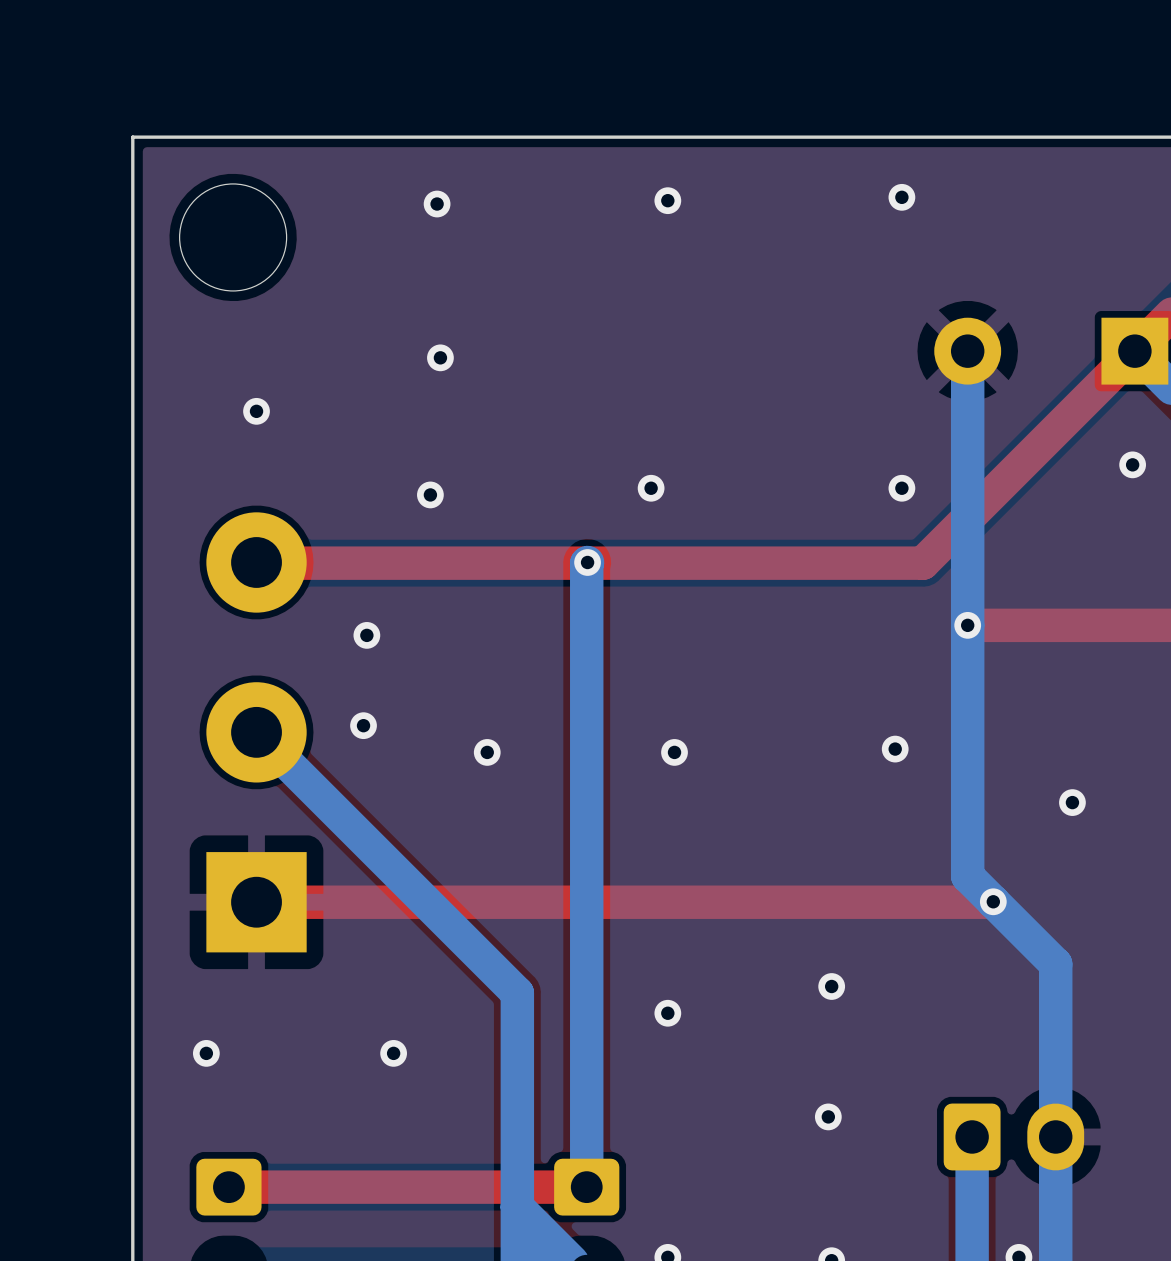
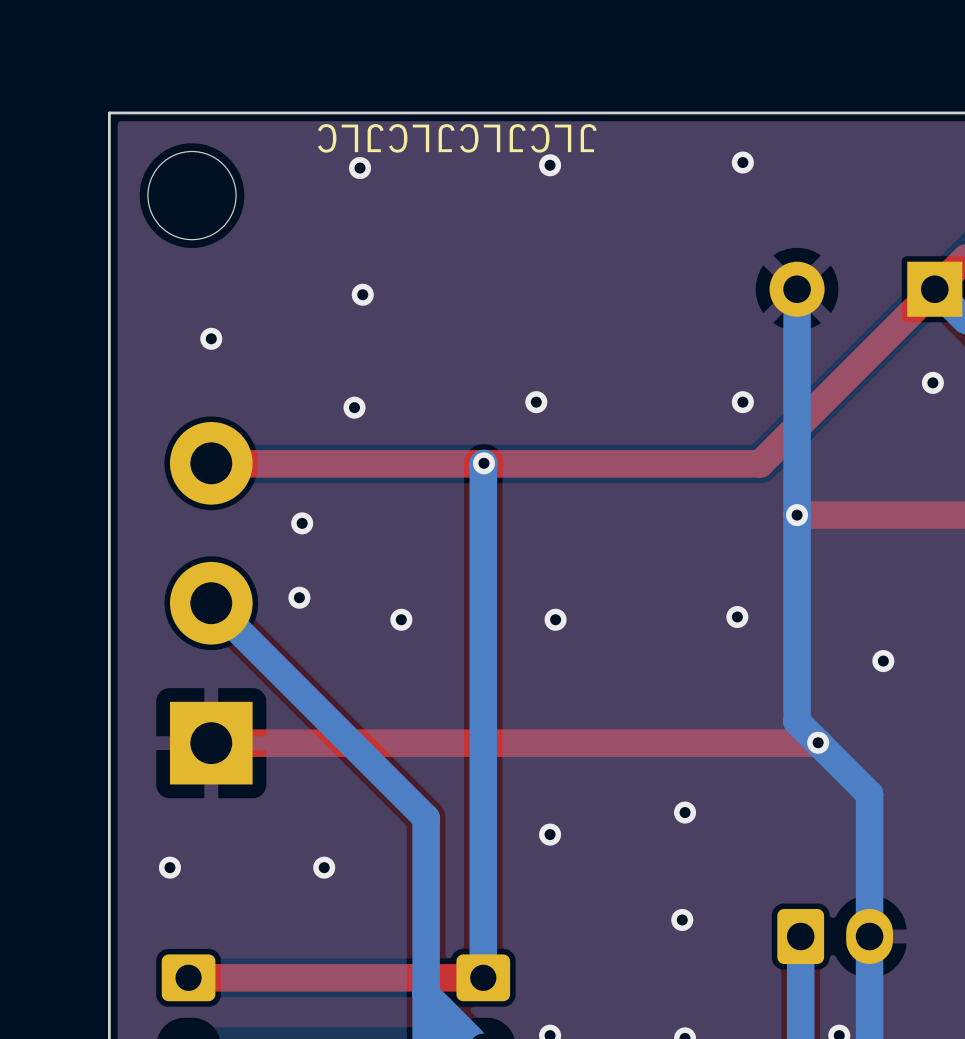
text: none -> JLCJLCJLCJLC (457, 138)

